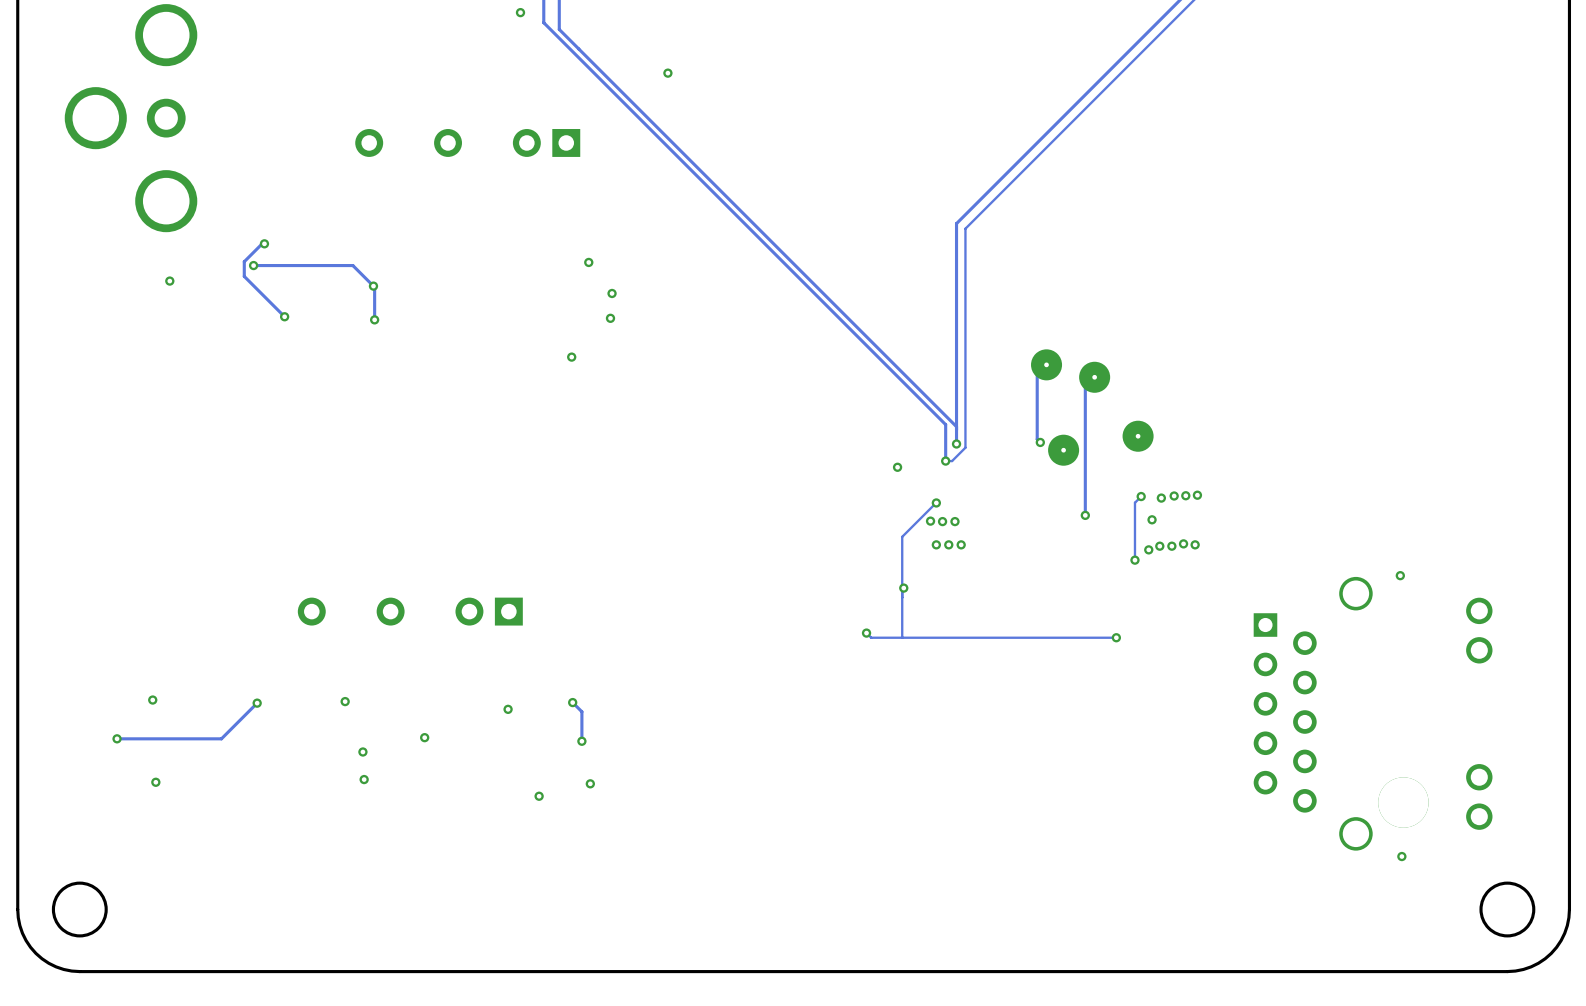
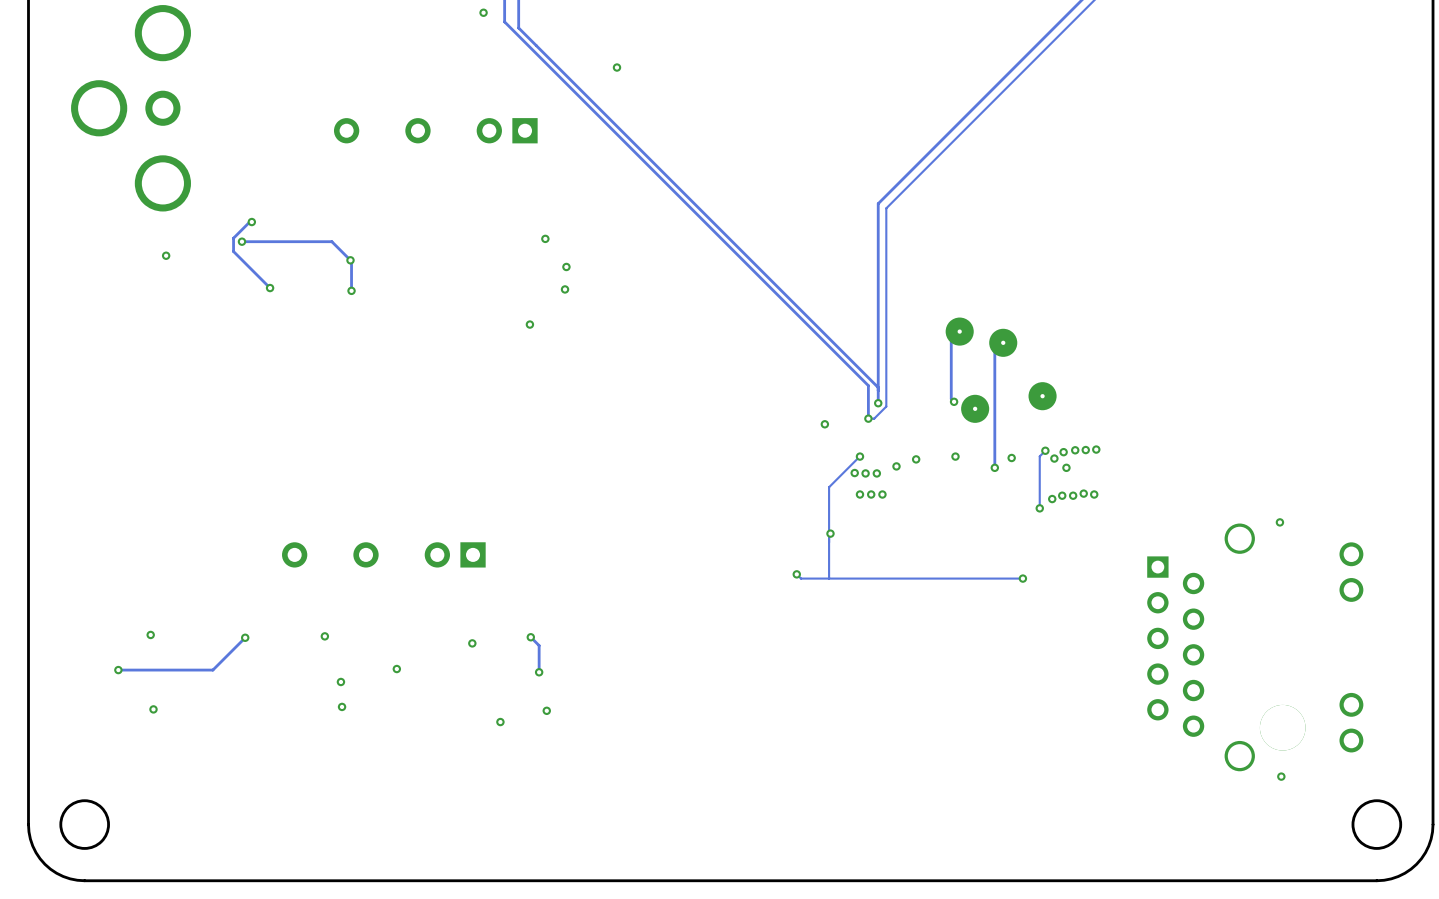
via: none -> (955, 456)
via: none -> (1011, 457)
via: none -> (1054, 458)
via: none -> (916, 459)
via: none -> (896, 466)
via: none -> (1066, 467)
via: (1152, 519) -> none

